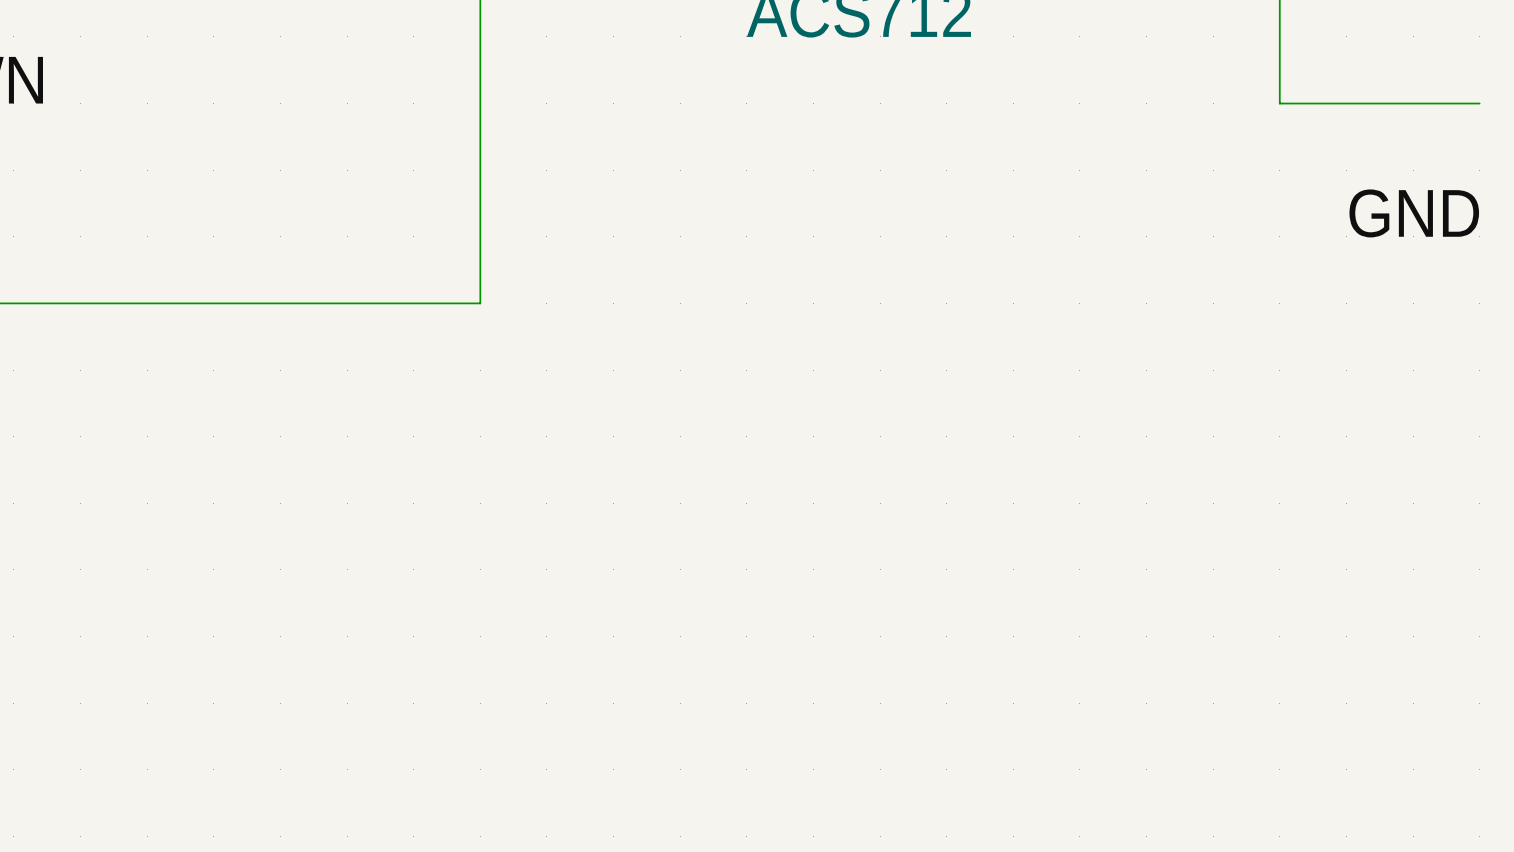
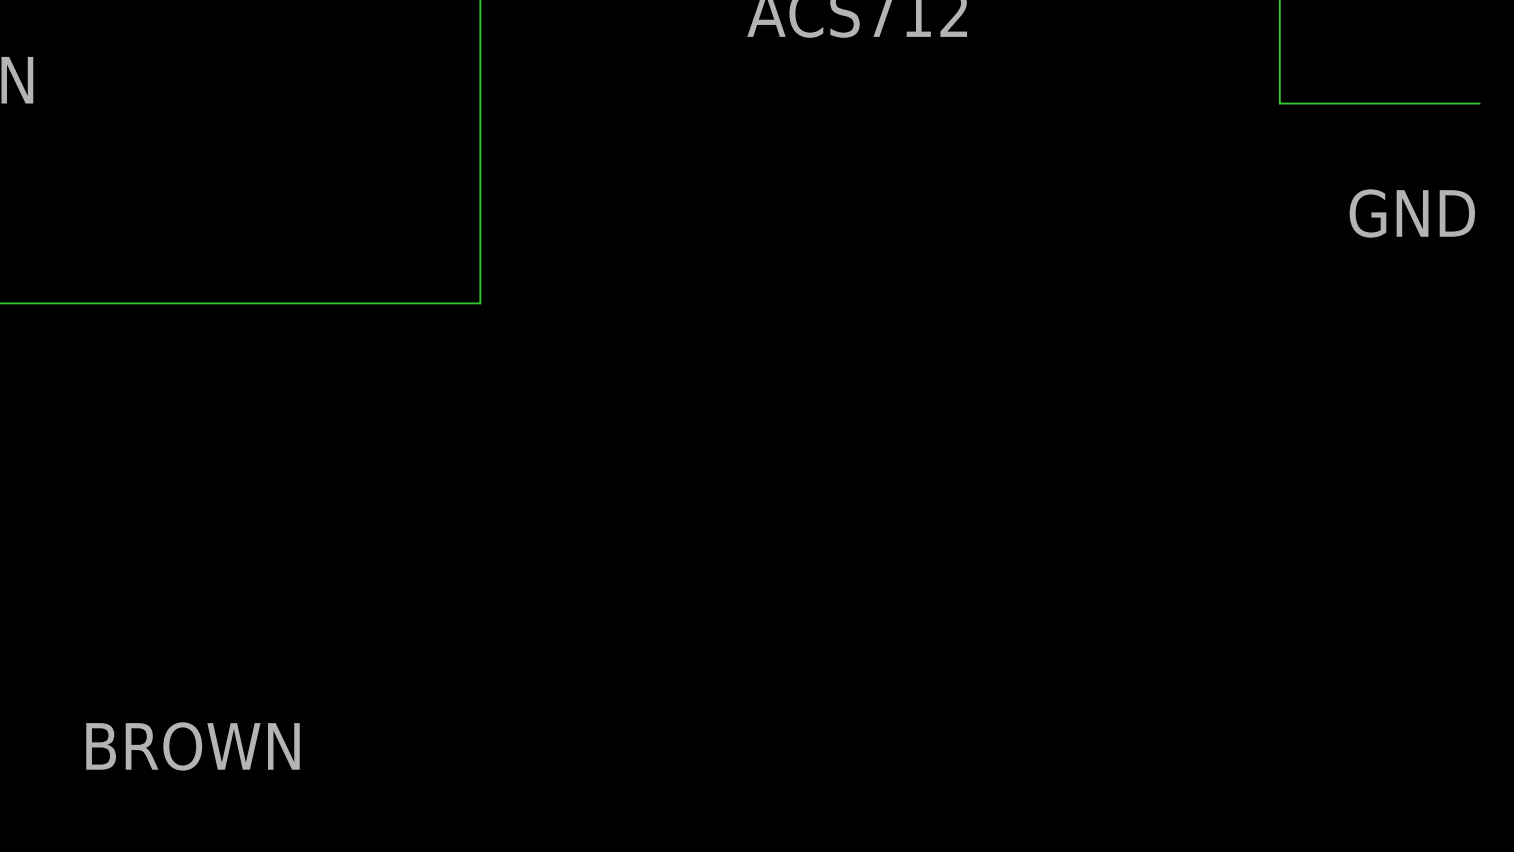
label: none -> BROWN (193, 746)

